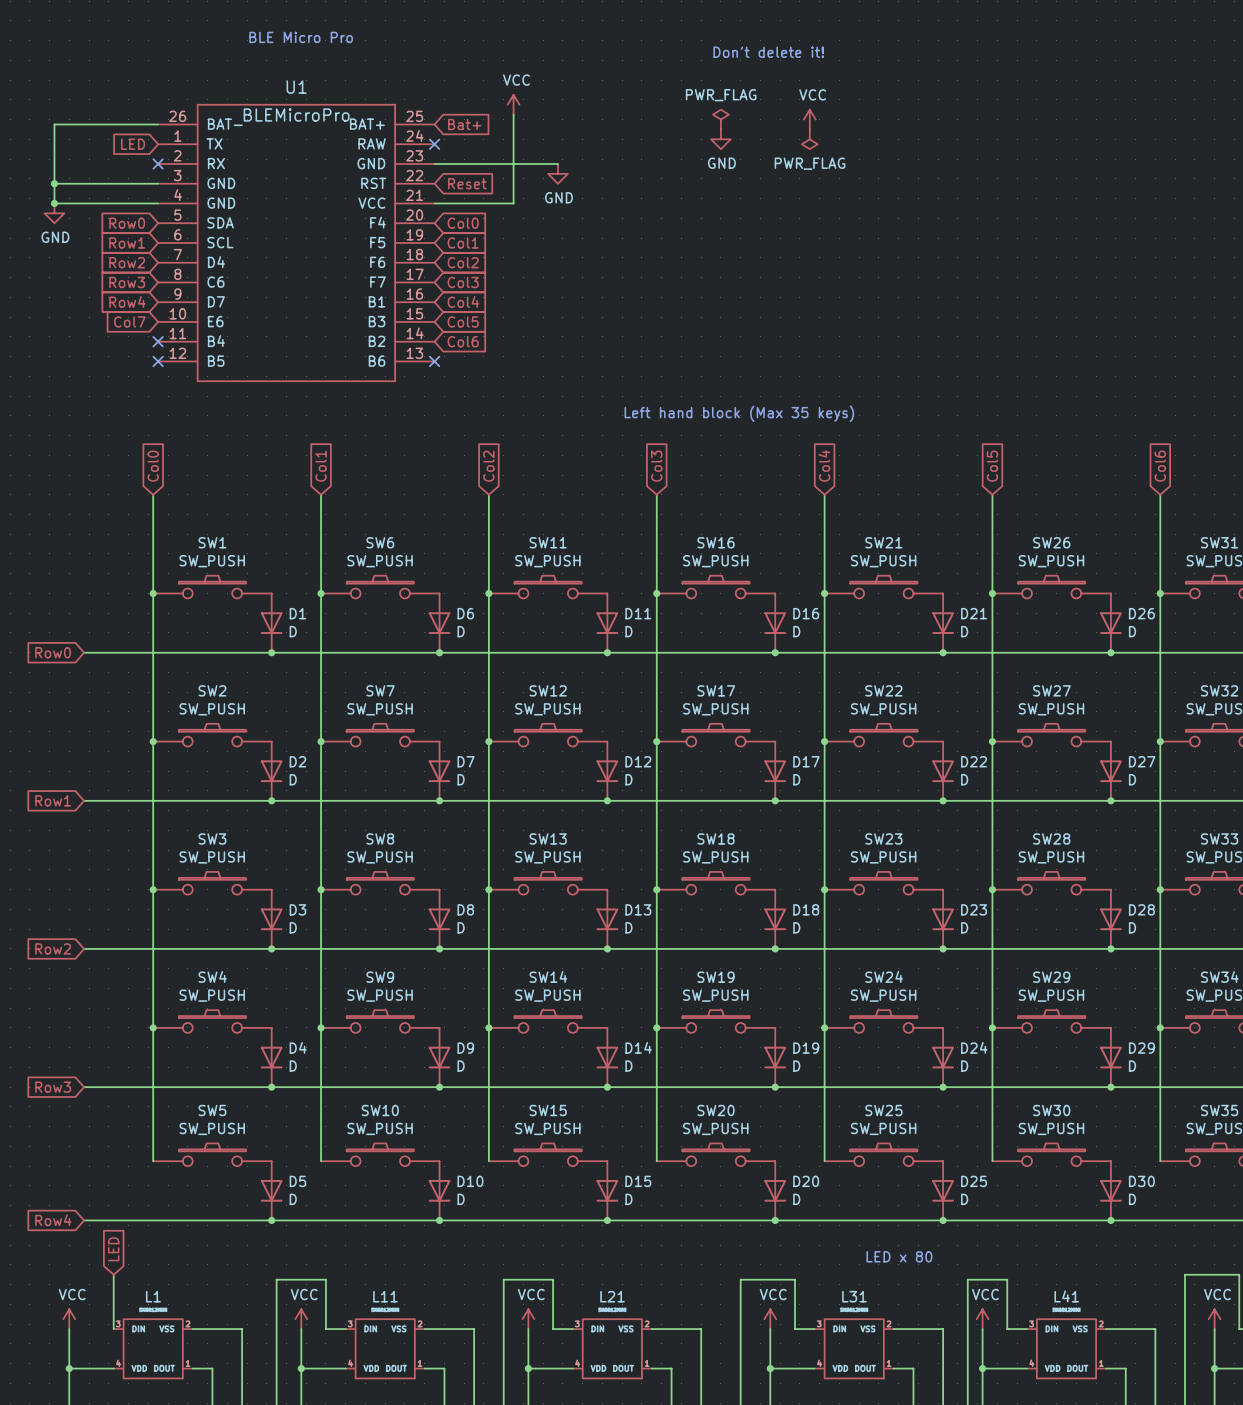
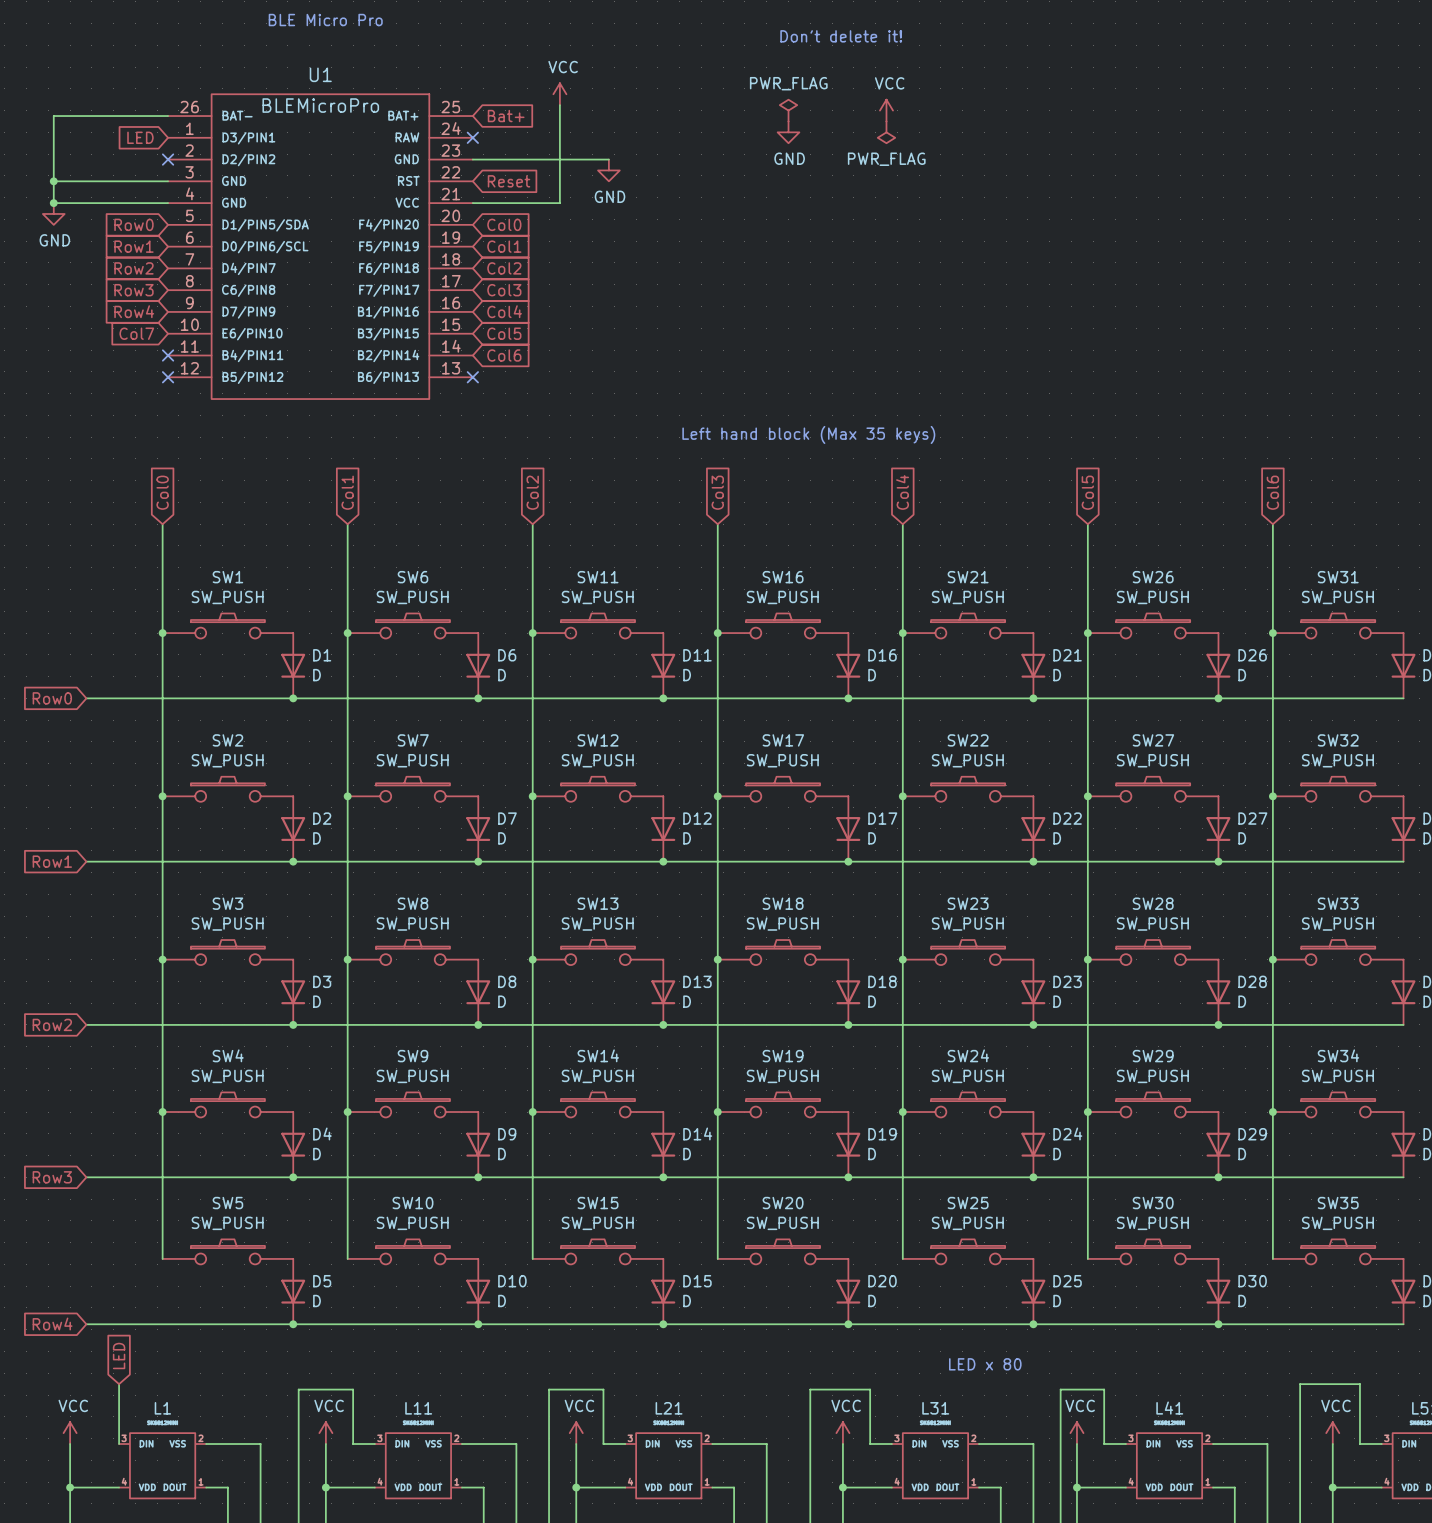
U1 symbol: [158, 104, 435, 382] -> [168, 94, 473, 400]

